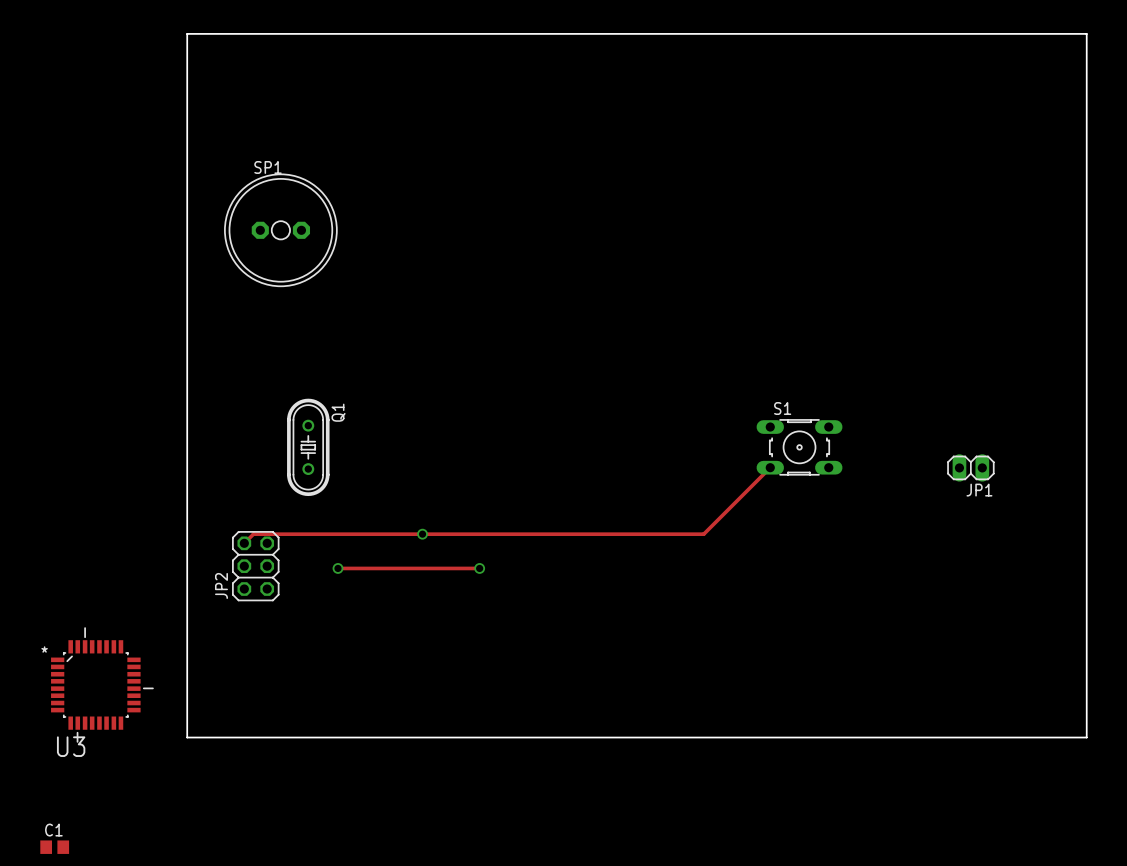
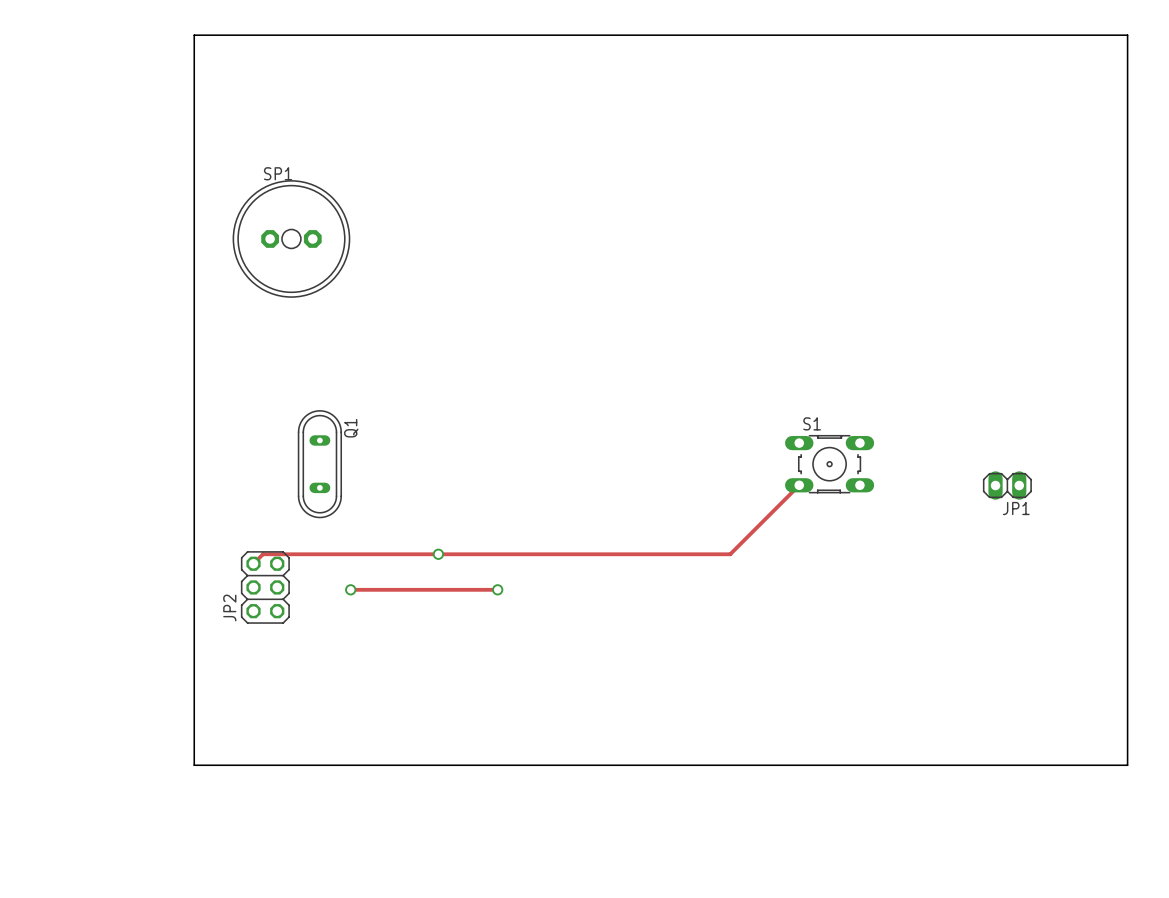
Q1 footprint: [287, 398, 330, 497] -> [297, 410, 342, 519]
U3: (102, 684) -> none
C1: (54, 847) -> none

